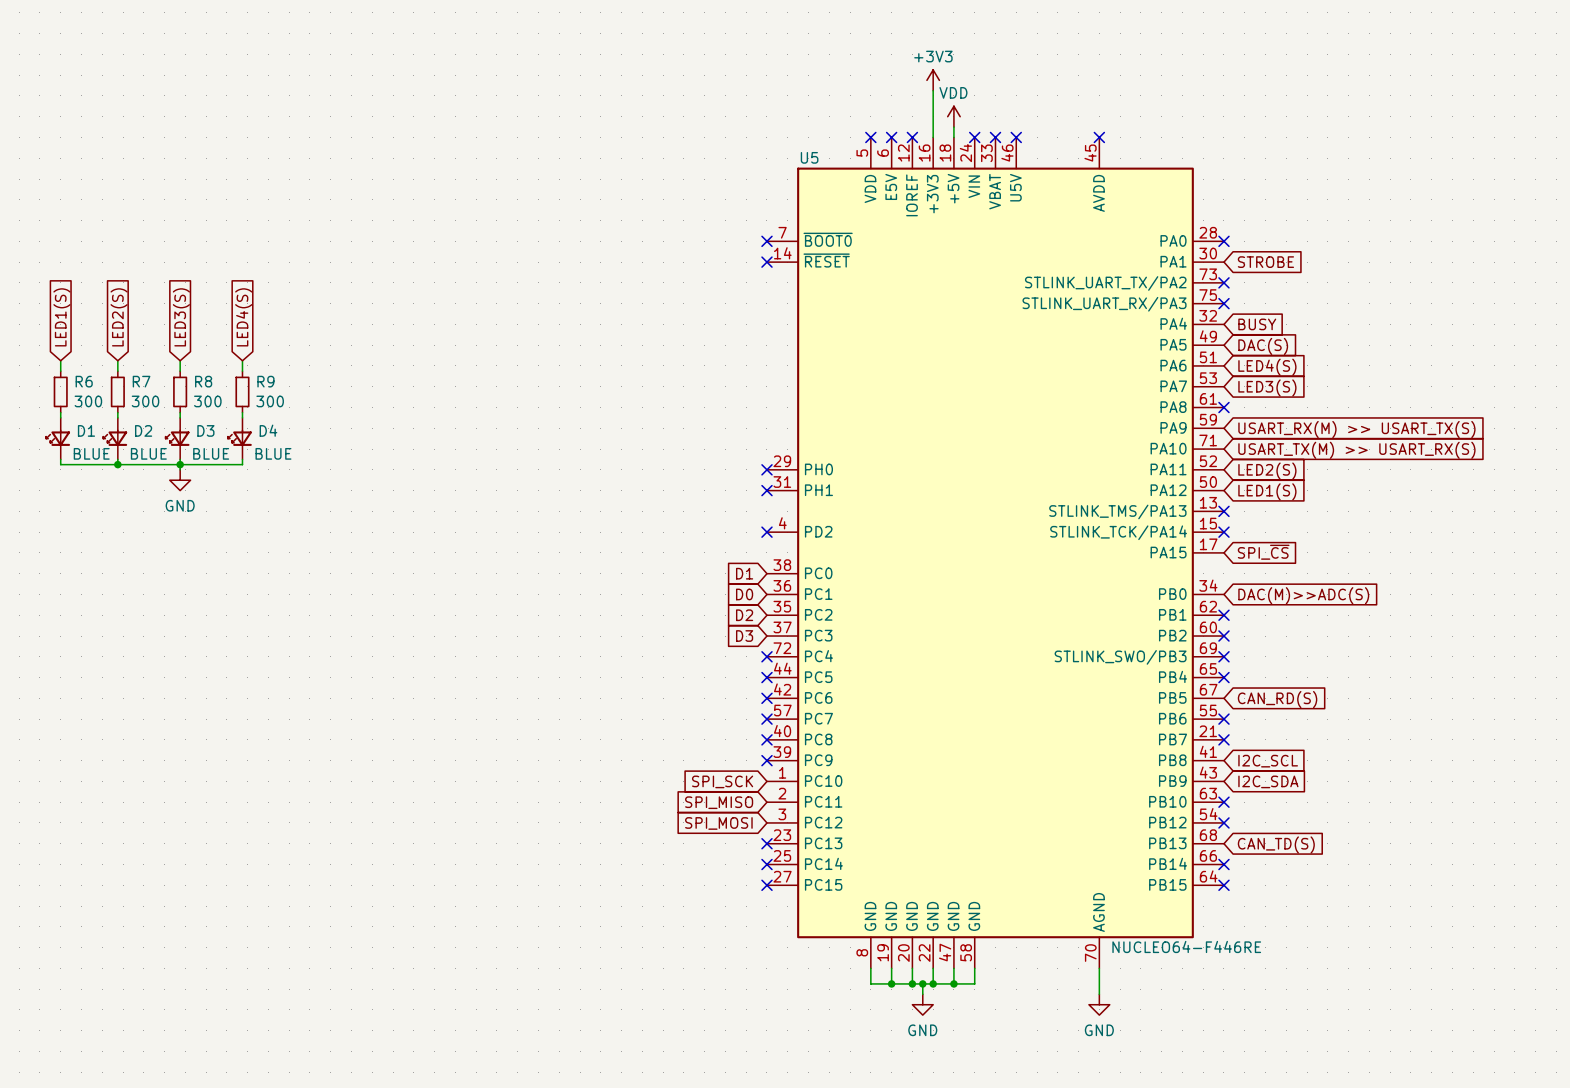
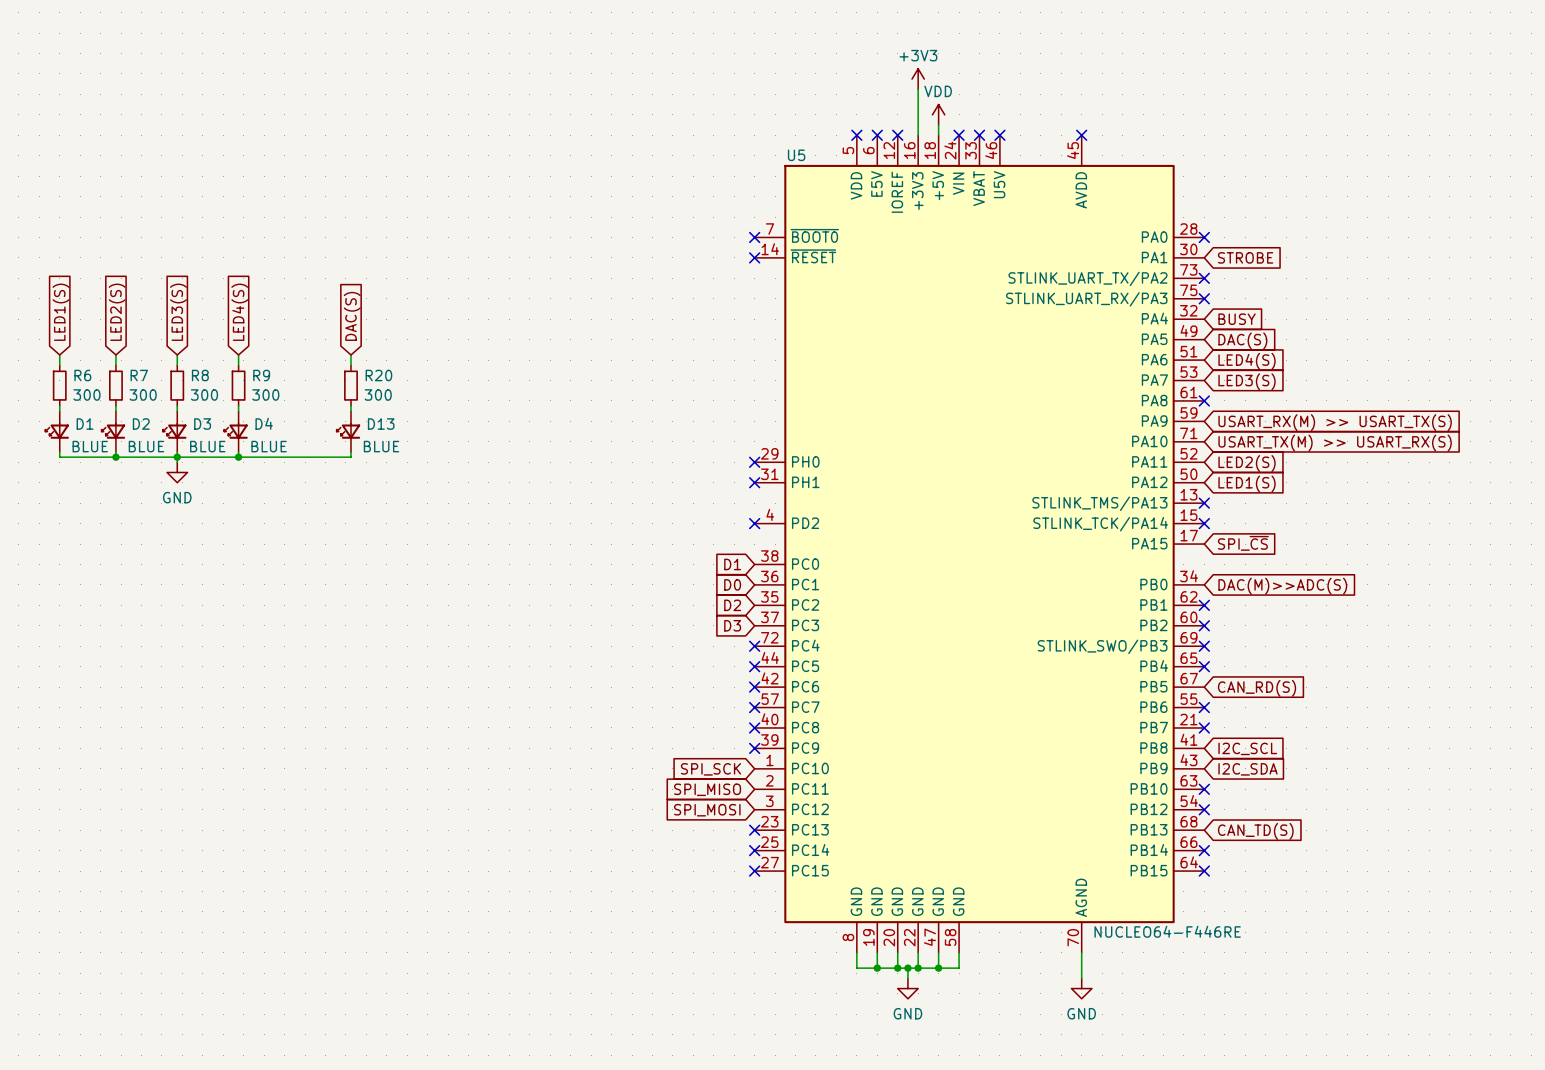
global label: none -> DAC(S) (352, 316)
wire: none -> (351, 354) (351, 365)
R20: none -> 300 (351, 385)
wire: none -> (351, 406) (351, 411)
D13: none -> BLUE (348, 431)
wire: none -> (351, 452) (351, 457) (238, 457)
junction: none -> (238, 457)

